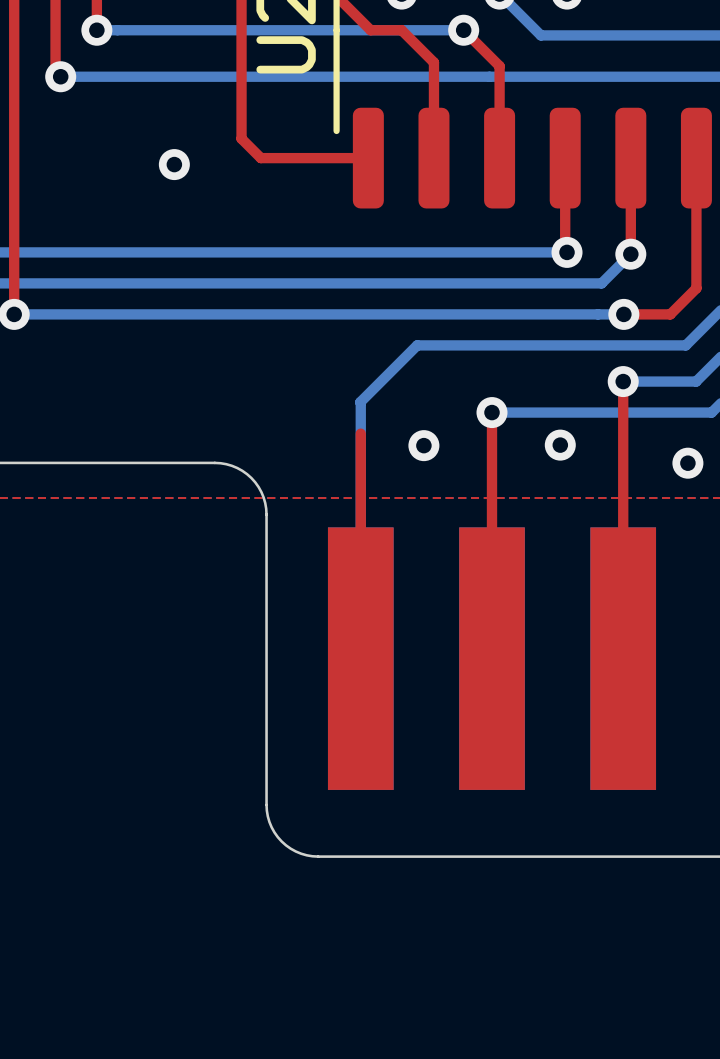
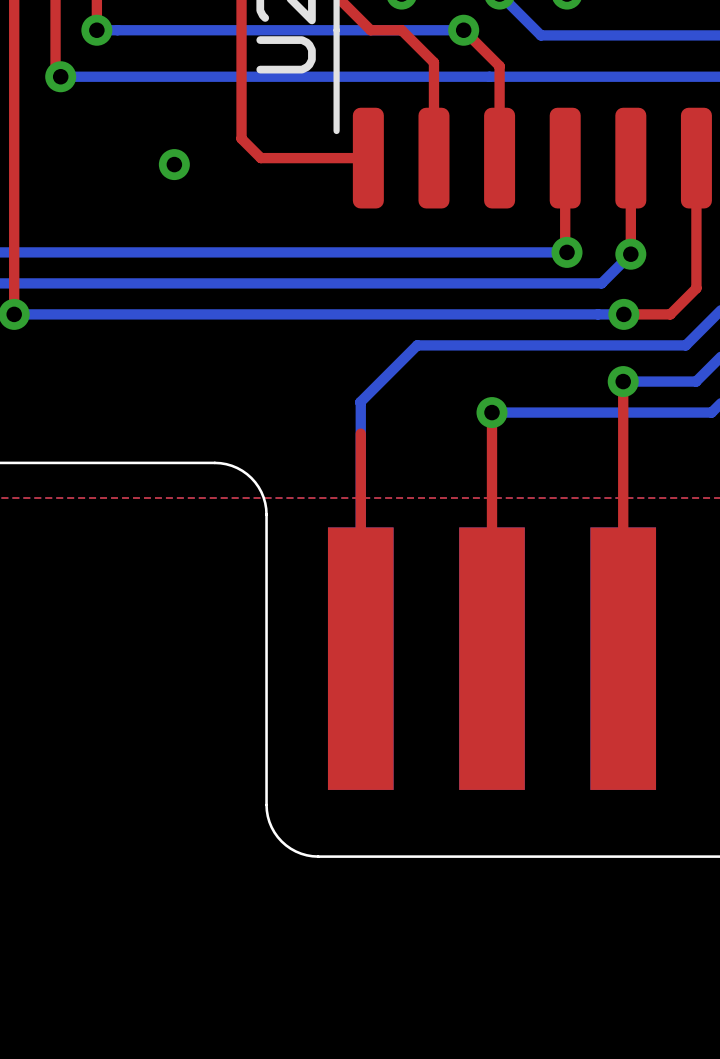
via: (423, 445) -> none
via: (560, 445) -> none
via: (687, 463) -> none

